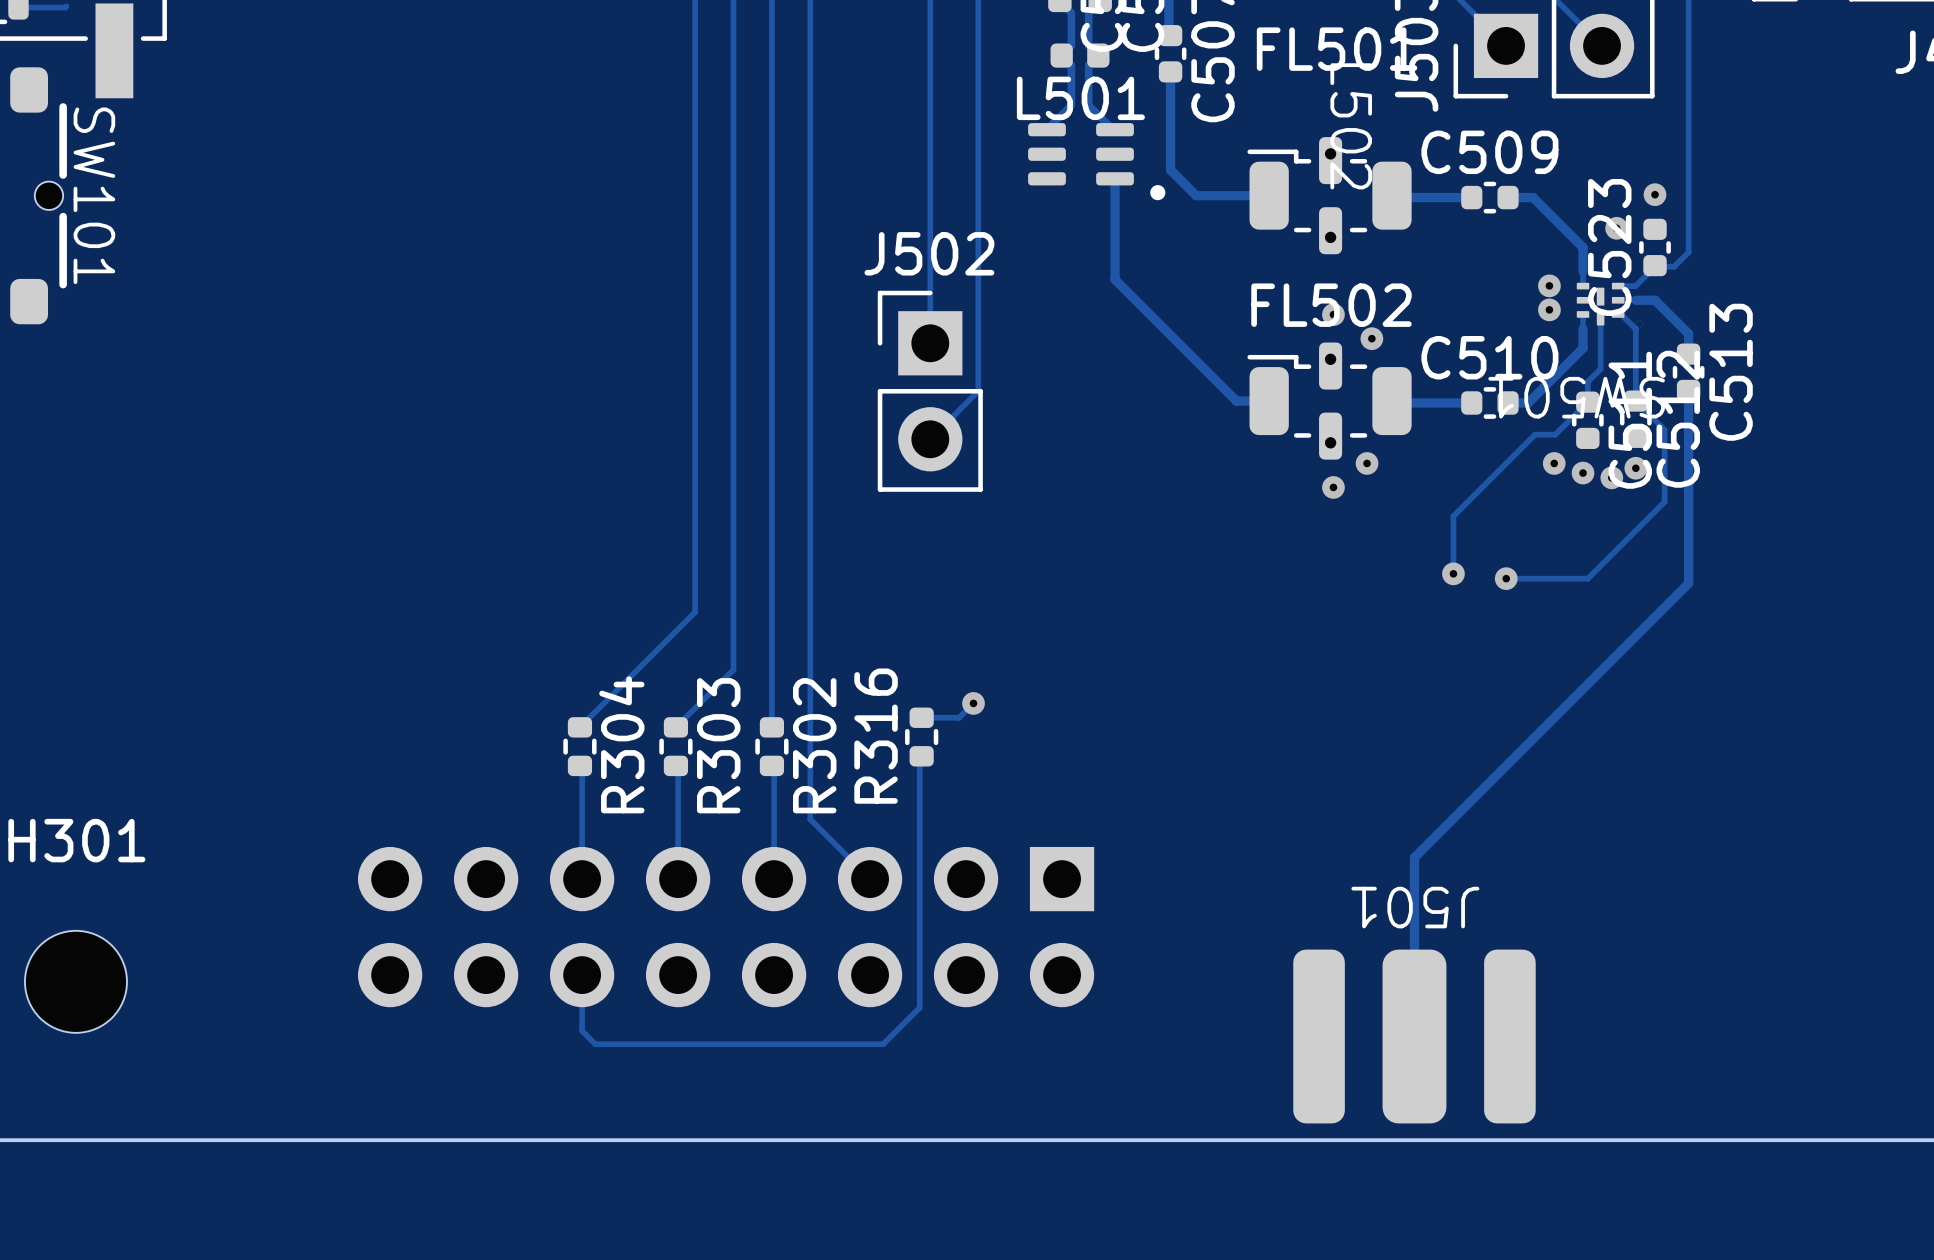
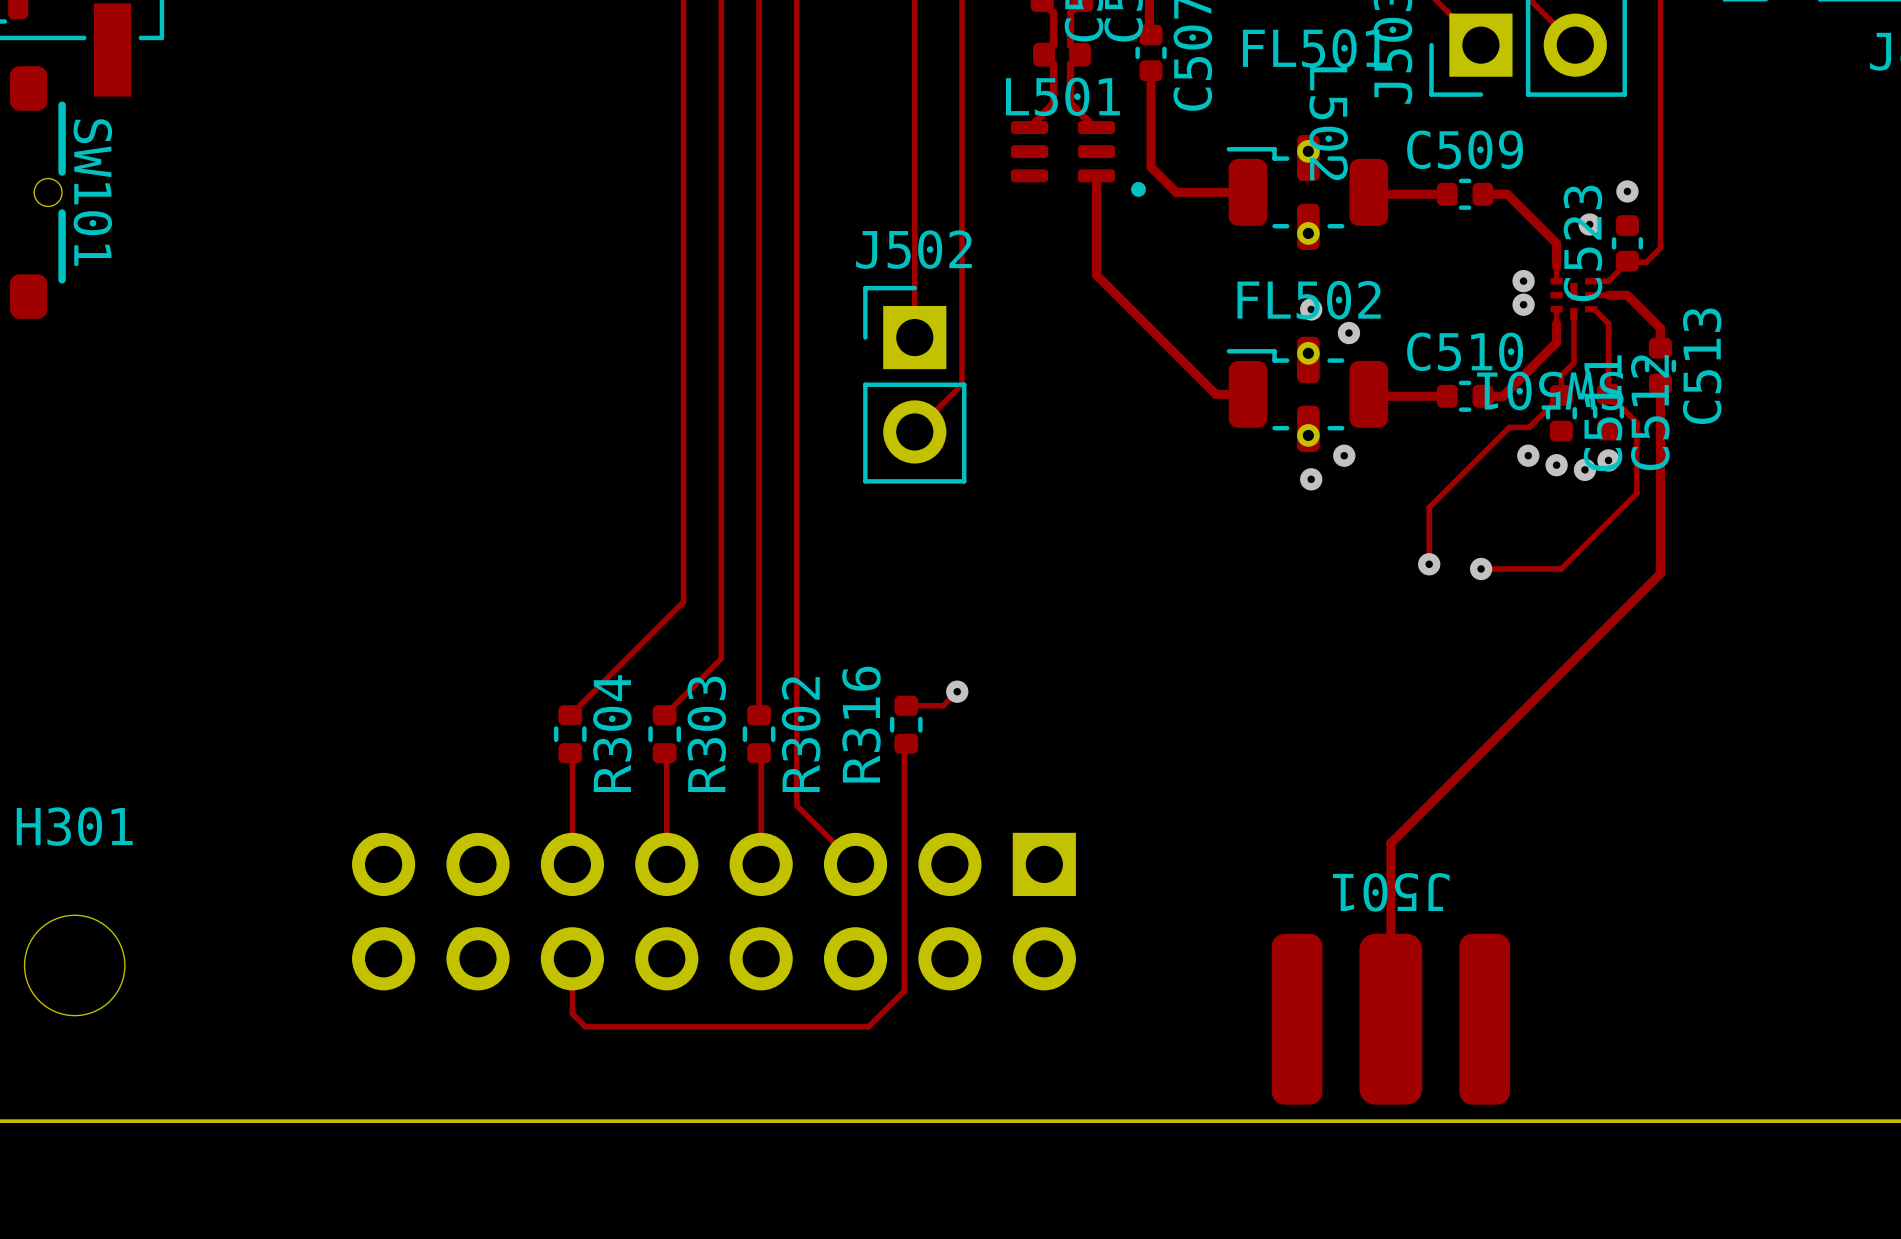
track: (66, 6) (18, 7) -> none

